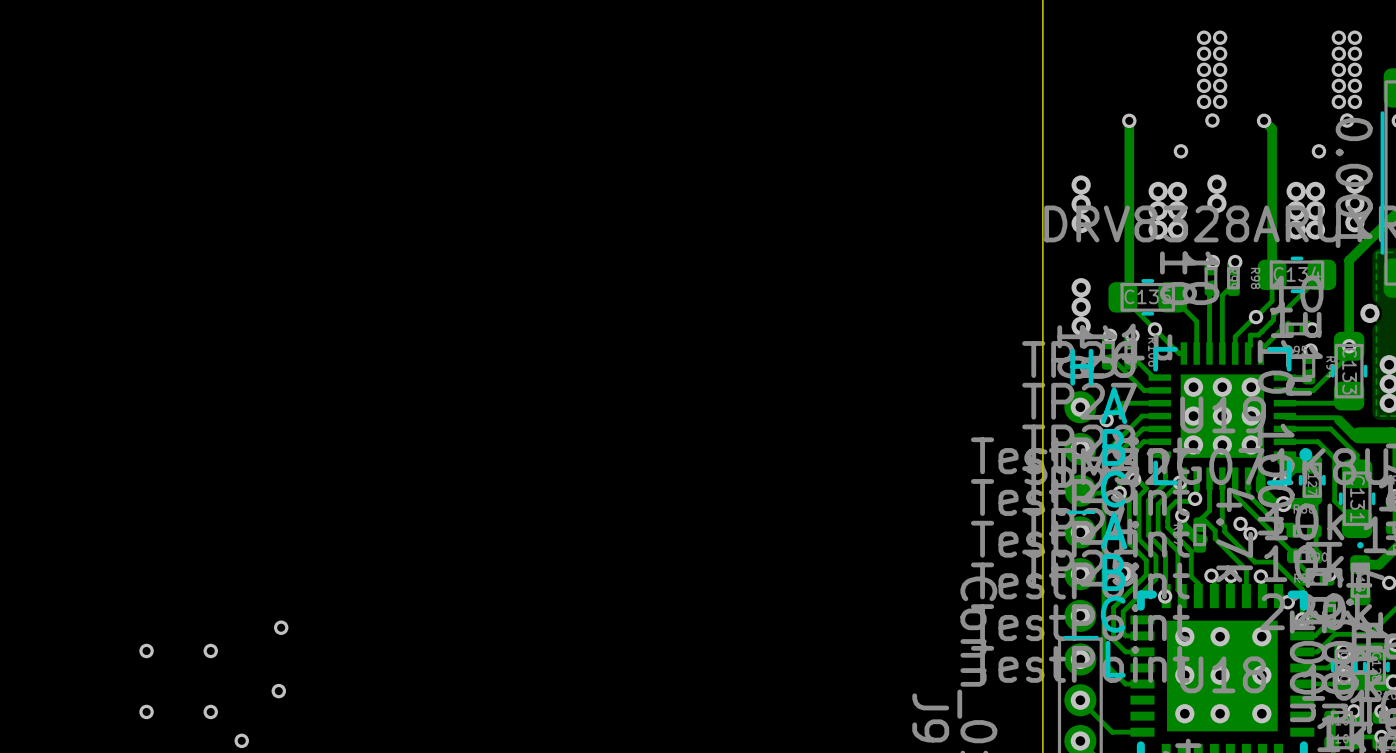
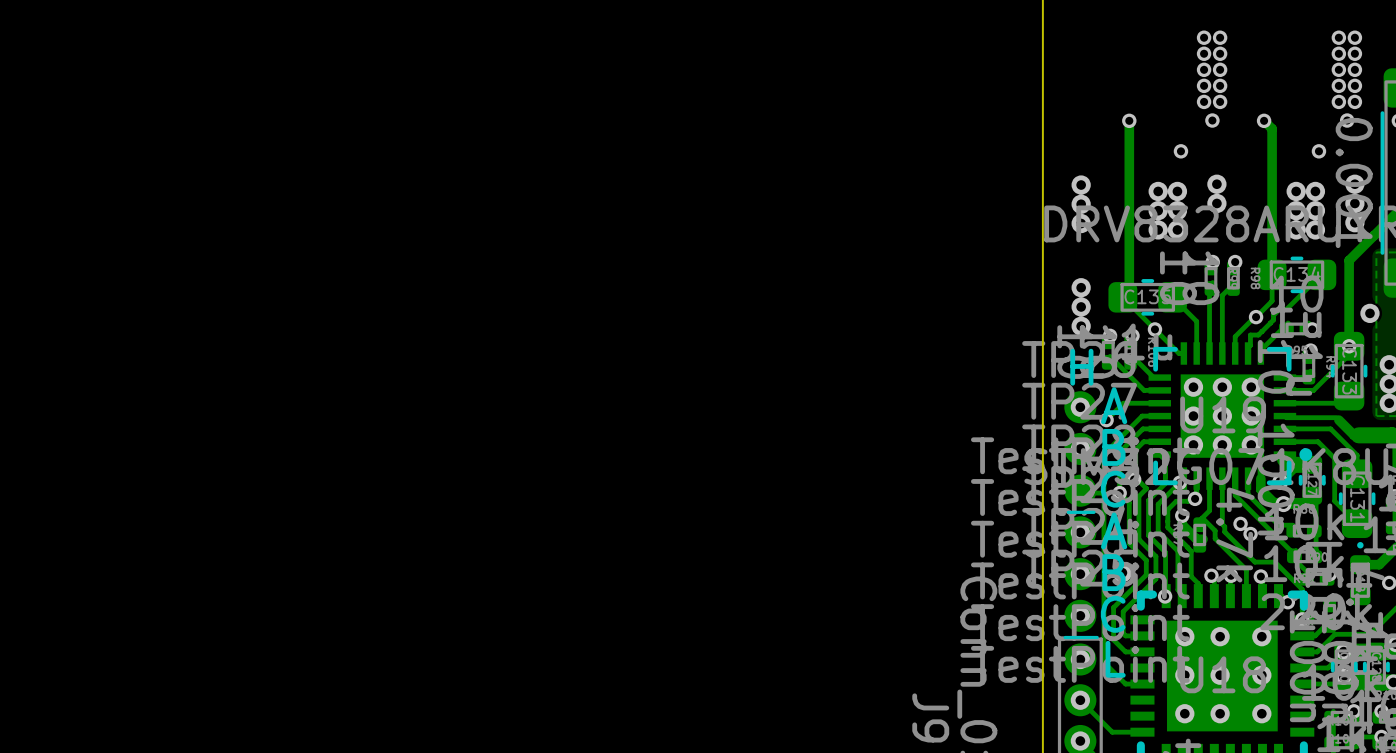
via: (281, 627) -> none
via: (146, 650) -> none
via: (210, 650) -> none
via: (278, 691) -> none
via: (146, 711) -> none
via: (210, 711) -> none
via: (241, 740) -> none

